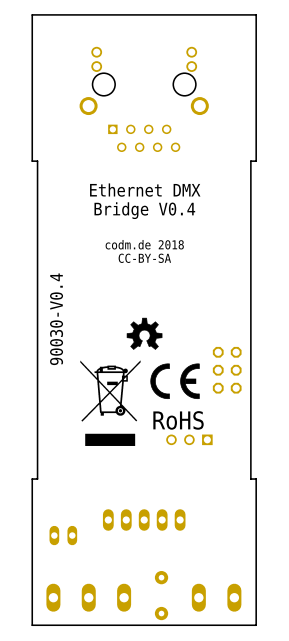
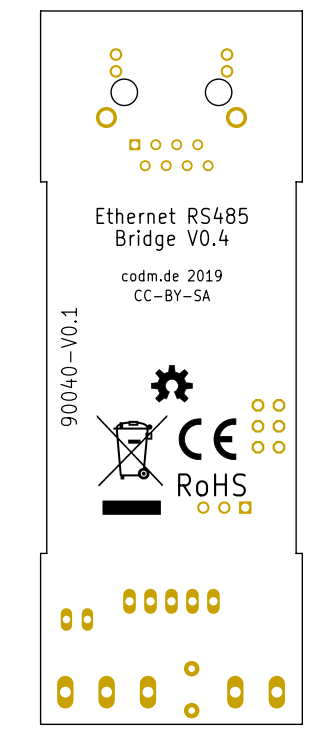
text: Ethernet DMX (145, 190) -> Ethernet RS485 (172, 215)
text: codm.de 2018 (144, 244) -> codm.de 2019 (171, 275)
text: 90030-V0.4 (56, 319) -> 90040-V0.1 (68, 366)

